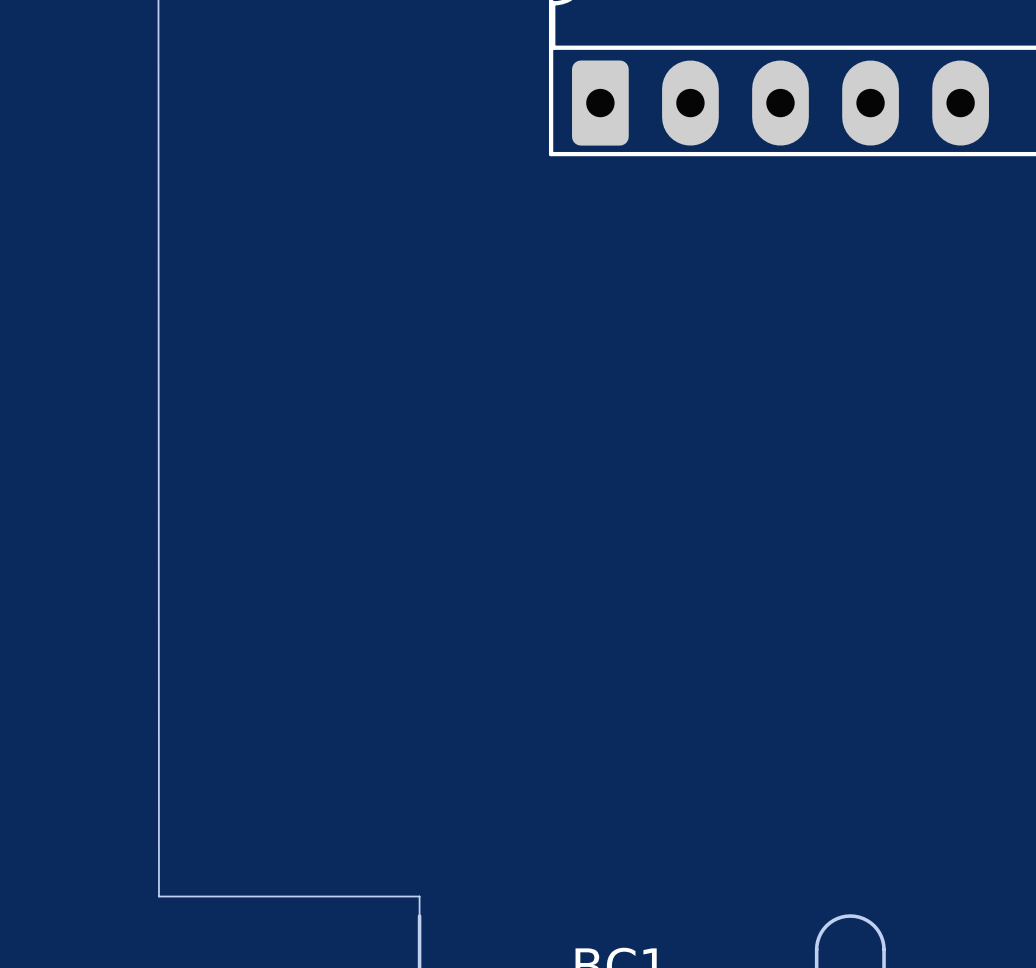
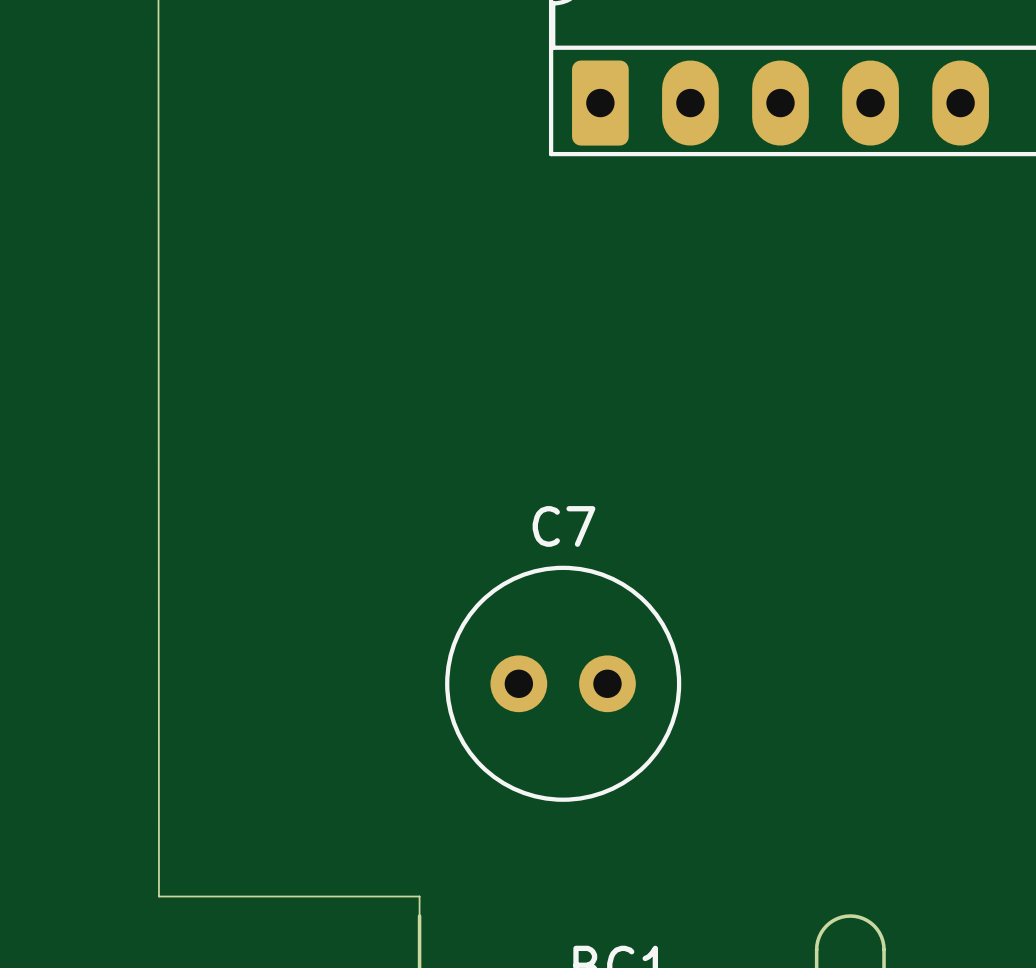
C7: none -> (563, 683)

